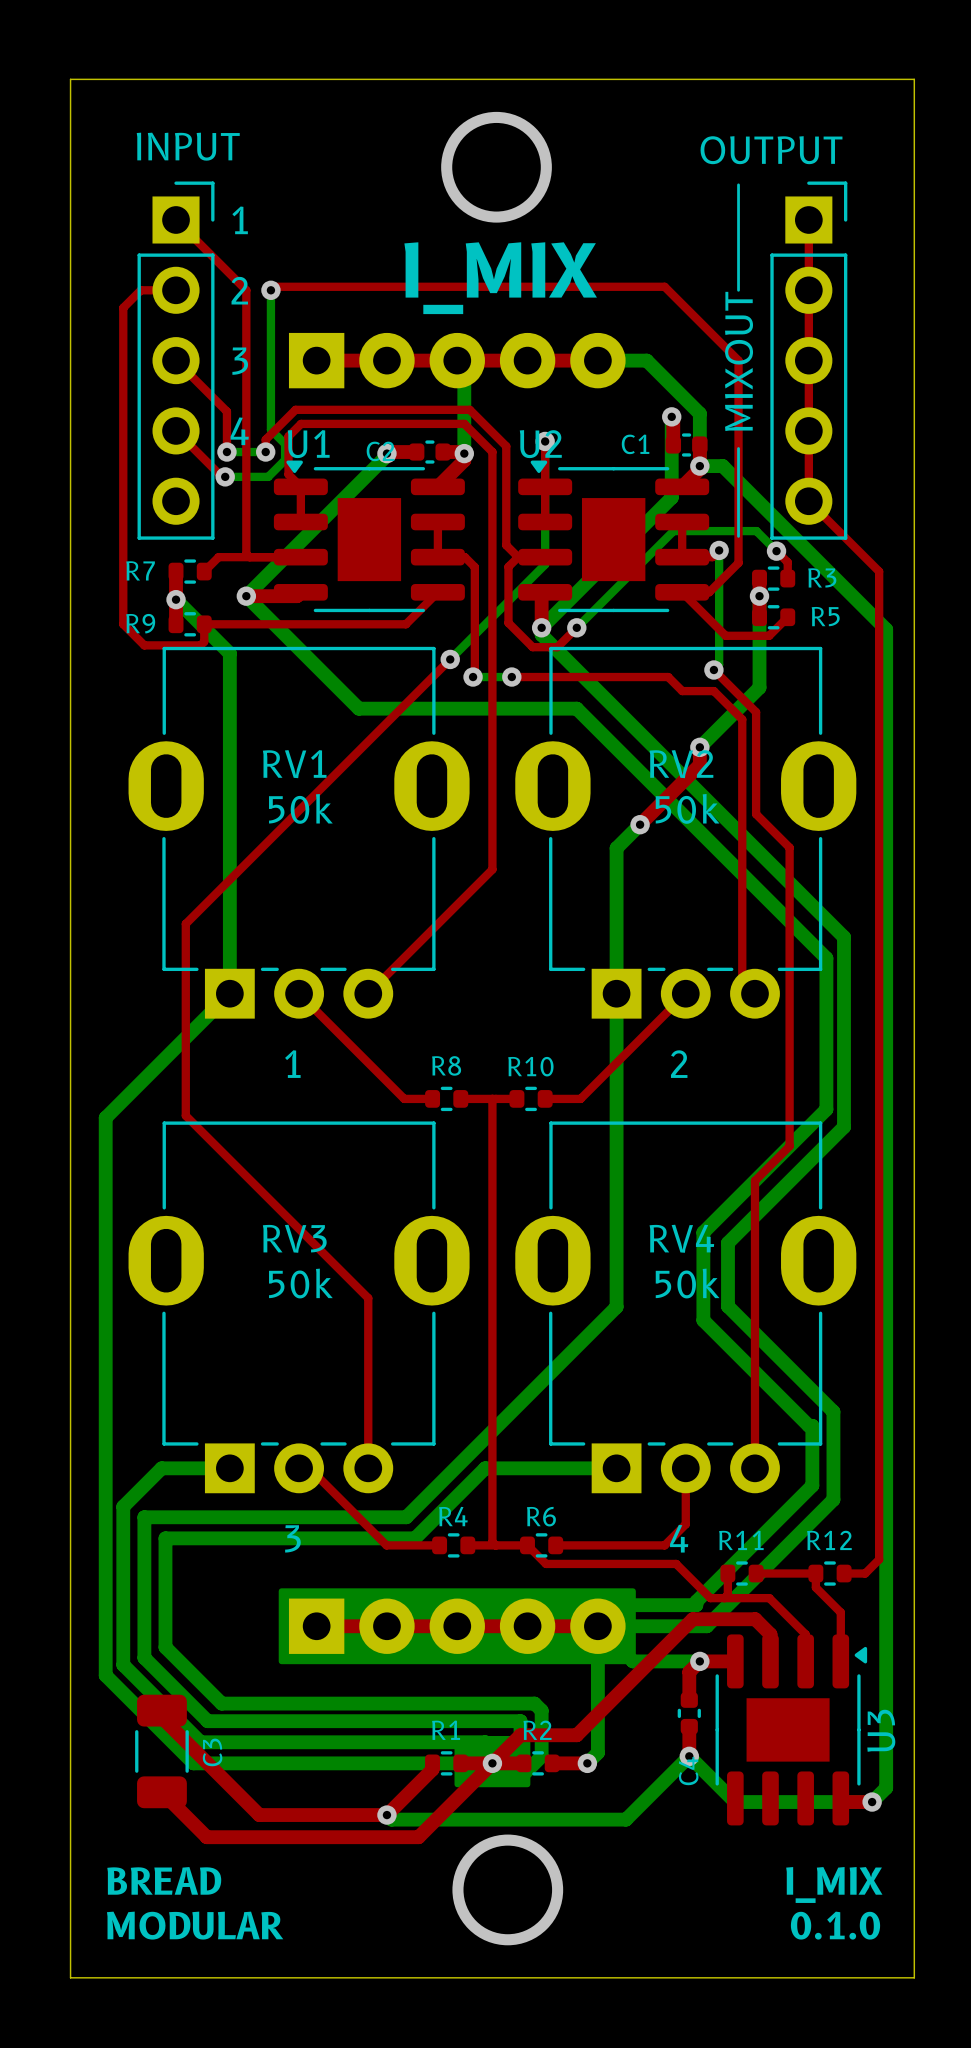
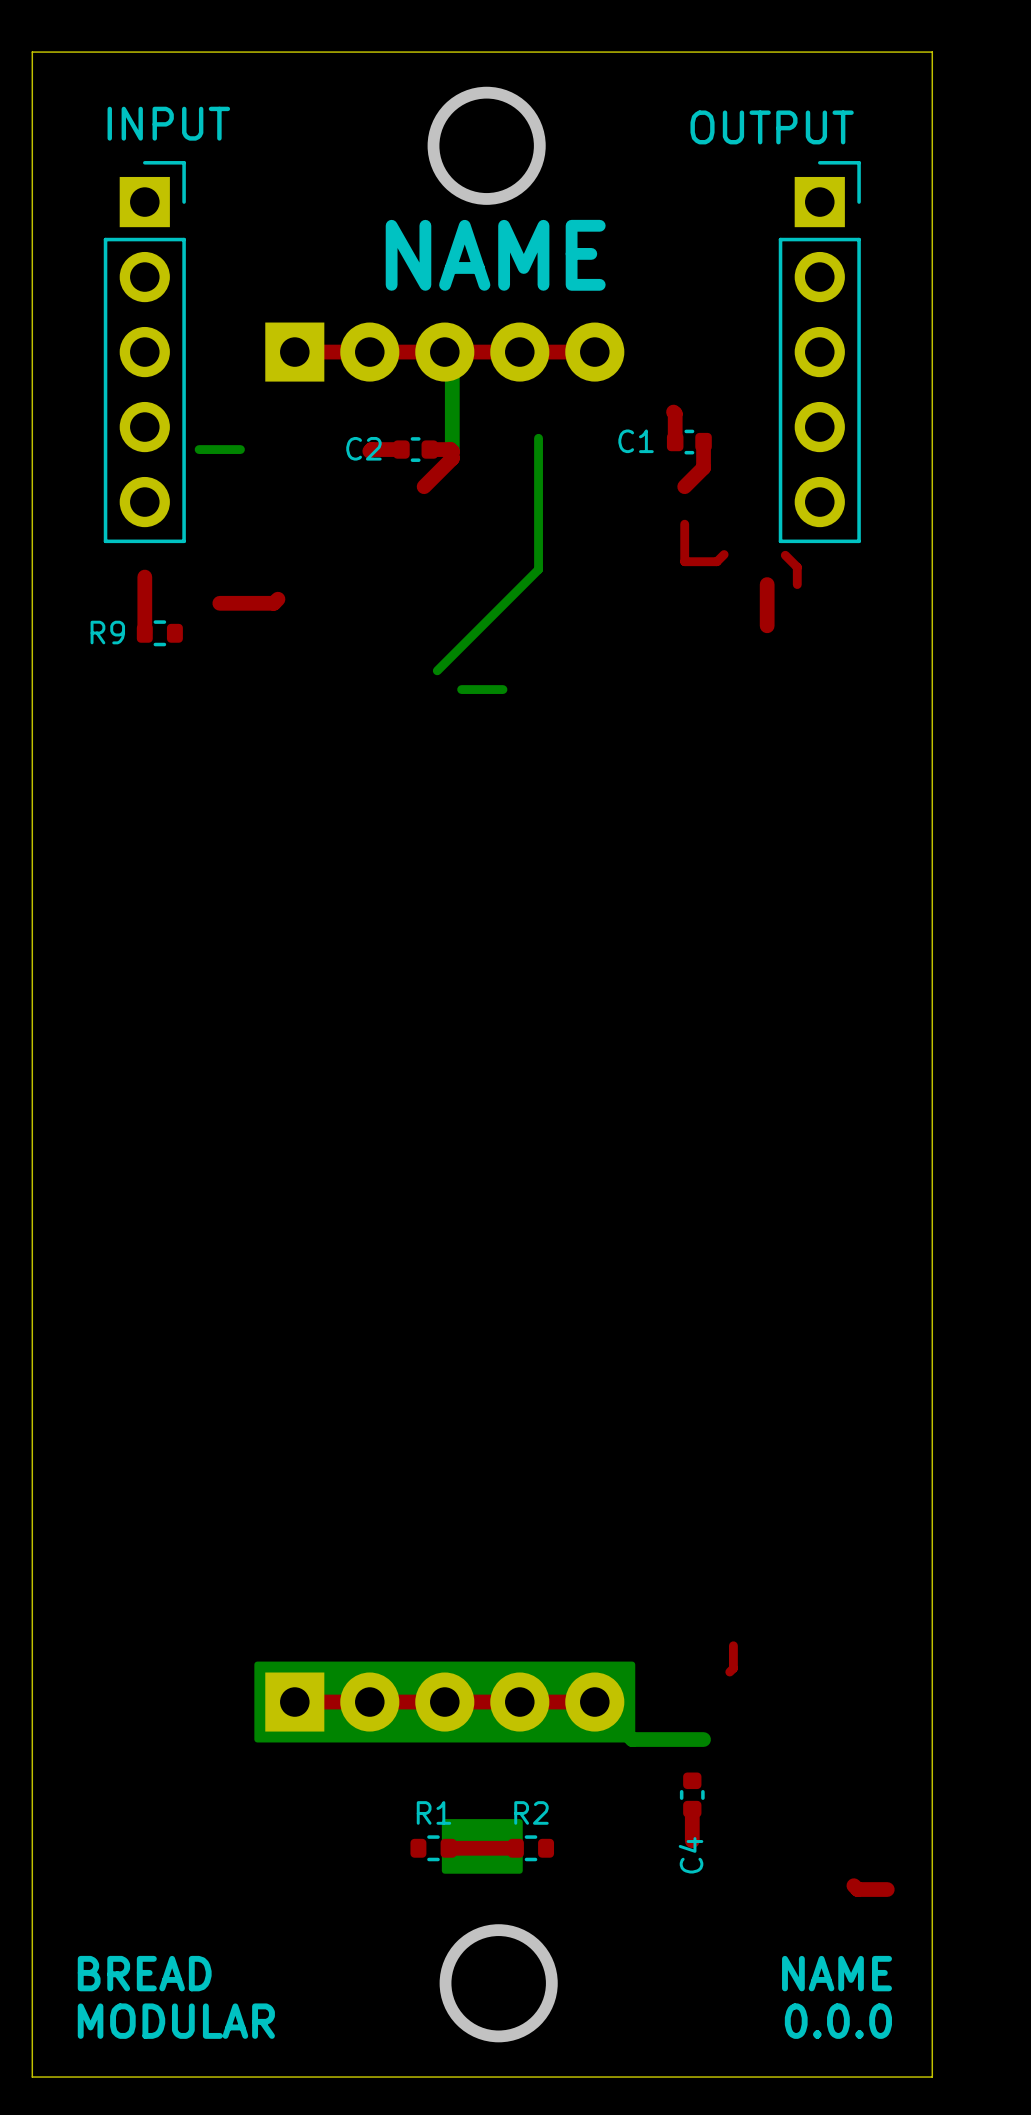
line: (738, 184) (738, 290) -> none
top track: (176, 219) (246, 290) (246, 553) (249, 557) -> none
top track: (808, 219) (808, 501) (879, 571) (879, 1559) (865, 1573) (844, 1573) -> none
text: 1 (240, 220) -> none
text: none -> NAME (495, 255)
text: I_MIX (500, 278) -> none
top track: (176, 290) (140, 290) (123, 307) (123, 624) (144, 645) (200, 645) (204, 641) (204, 624) (405, 624) (437, 592) -> none
text: 2 (239, 290) -> none
top track: (270, 290) (274, 286) (664, 286) (738, 360) (738, 562) (709, 592) (682, 592) (725, 635) (769, 635) (787, 617) -> none
bottom track: (270, 290) (270, 429) (285, 444) (285, 460) (268, 476) (225, 476) -> none
via: (270, 290) -> none
top track: (176, 360) (226, 411) (226, 452) -> none
bottom track: (597, 360) (646, 360) (699, 413) (699, 466) (722, 466) (886, 629) (886, 1787) (872, 1802) (735, 1802) (689, 1756) (626, 1819) (391, 1819) (386, 1815) -> none
text: 3 (240, 361) -> none
text: MIXOUT (739, 361) -> none
bottom track: (671, 416) (671, 497) (541, 627) (541, 634) (843, 937) (843, 1127) (727, 1243) (727, 1306) (833, 1411) (833, 1499) (706, 1626) (457, 1626) (439, 1608) -> none
via: (671, 416) -> none
top track: (176, 430) (221, 476) (225, 476) -> none
text: 4 (239, 431) -> none
top track: (545, 441) (545, 522) -> none
via: (545, 441) -> none
line: (738, 448) (738, 536) -> none
via: (226, 452) -> none
top track: (265, 452) (265, 439) (295, 409) (469, 409) (506, 446) (506, 545) (518, 557) -> none
via: (265, 452) -> none
bottom track: (386, 453) (246, 596) (358, 708) (576, 708) (826, 958) (826, 1109) (703, 1232) (703, 1320) (808, 1425) (812, 1425) (812, 1485) (696, 1601) (696, 1605) (618, 1605) (597, 1626) (597, 1752) (587, 1763) -> none
via: (386, 453) -> none
via: (464, 453) -> none
via: (699, 466) -> none
via: (225, 476) -> none
top track: (300, 522) (300, 486) (288, 474) (288, 436) (301, 423) (464, 423) (492, 452) (492, 869) (368, 993) -> none
top track: (437, 522) (437, 557) (464, 557) (474, 567) (474, 675) (473, 677) -> none
U1: (369, 536) -> none
U2: (613, 536) -> none
bottom track: (719, 550) (719, 664) (713, 669) -> none
via: (719, 550) -> none
bottom track: (776, 551) (756, 531) (673, 531) (576, 627) -> none
via: (776, 551) -> none
top track: (300, 557) (218, 557) (204, 571) -> none
top track: (518, 557) (508, 566) (508, 622) (532, 647) (557, 647) (576, 627) -> none
R7: (190, 571) -> none
R3: (773, 578) -> none
top track: (545, 592) (541, 595) (541, 627) -> none
via: (246, 596) -> none
bottom track: (759, 596) (759, 687) (699, 747) -> none
via: (759, 596) -> none
bottom track: (176, 599) (229, 653) (229, 993) (105, 1117) (105, 1675) (193, 1763) (492, 1763) -> none
via: (176, 599) -> none
R5: (773, 617) -> none
via: (541, 627) -> none
via: (576, 627) -> none
top track: (450, 659) (185, 923) (185, 1115) (368, 1298) (368, 1468) -> none
via: (450, 659) -> none
top track: (713, 669) (756, 712) (756, 814) (789, 847) (789, 1146) (755, 1180) (755, 1468) -> none
via: (713, 669) -> none
via: (473, 677) -> none
top track: (511, 677) (668, 677) (682, 691) (713, 691) (742, 719) (742, 980) (755, 993) -> none
via: (511, 677) -> none
top track: (699, 747) (699, 764) (640, 824) -> none
via: (699, 747) -> none
bottom track: (640, 824) (616, 848) (616, 1306) (406, 1517) (144, 1517) (144, 1657) (207, 1721) (520, 1721) (520, 1742) (513, 1742) (492, 1763) -> none
via: (640, 824) -> none
RV1: 50k (299, 832) -> none
RV2: 50k (685, 832) -> none
top track: (299, 993) (404, 1098) (432, 1098) -> none
top track: (685, 993) (580, 1098) (545, 1098) -> none
text: 1 (292, 1064) -> none
text: 2 (679, 1064) -> none
R8: (446, 1098) -> none
top track: (460, 1098) (516, 1098) -> none
top track: (492, 1098) (492, 1541) (495, 1545) -> none
R10: (531, 1098) -> none
RV3: 50k (299, 1307) -> none
RV4: 50k (685, 1307) -> none
top track: (298, 1457) (386, 1545) (439, 1545) -> none
bottom track: (229, 1468) (161, 1468) (123, 1506) (123, 1664) (200, 1742) (485, 1742) (492, 1749) (492, 1763) -> none
bottom track: (616, 1468) (485, 1468) (415, 1538) (165, 1538) (165, 1647) (221, 1703) (534, 1703) (541, 1710) (541, 1756) (520, 1777) (506, 1777) (492, 1763) -> none
top track: (685, 1468) (685, 1524) (664, 1545) (555, 1545) -> none
text: 3 (292, 1538) -> none
text: 4 (679, 1538) -> none
R4: (453, 1545) -> none
top track: (467, 1545) (527, 1545) (546, 1563) (676, 1563) (710, 1598) (769, 1598) (805, 1634) (805, 1661) -> none
R6: (541, 1545) -> none
R11: (741, 1573) -> none
top track: (756, 1573) (815, 1573) (815, 1587) (840, 1612) (840, 1661) -> none
R12: (829, 1573) -> none
via: (699, 1661) -> none
top track: (735, 1661) (699, 1661) (689, 1671) (689, 1700) -> none
top track: (770, 1661) (770, 1634) (755, 1619) (692, 1619) (576, 1735) (520, 1735) (418, 1837) (206, 1837) (161, 1792) -> none
top track: (161, 1710) (161, 1717) (259, 1815) (386, 1815) (432, 1769) (432, 1763) -> none
U3: (791, 1729) -> none
C3: (161, 1751) -> none
via: (689, 1756) -> none
via: (492, 1763) -> none
top track: (552, 1763) (587, 1763) -> none
via: (587, 1763) -> none
via: (872, 1802) -> none
via: (386, 1815) -> none
text: I_MIX (834, 1885) -> NAME (837, 1973)
text: 0.1.0 (835, 1925) -> 0.0.0 (838, 2021)

